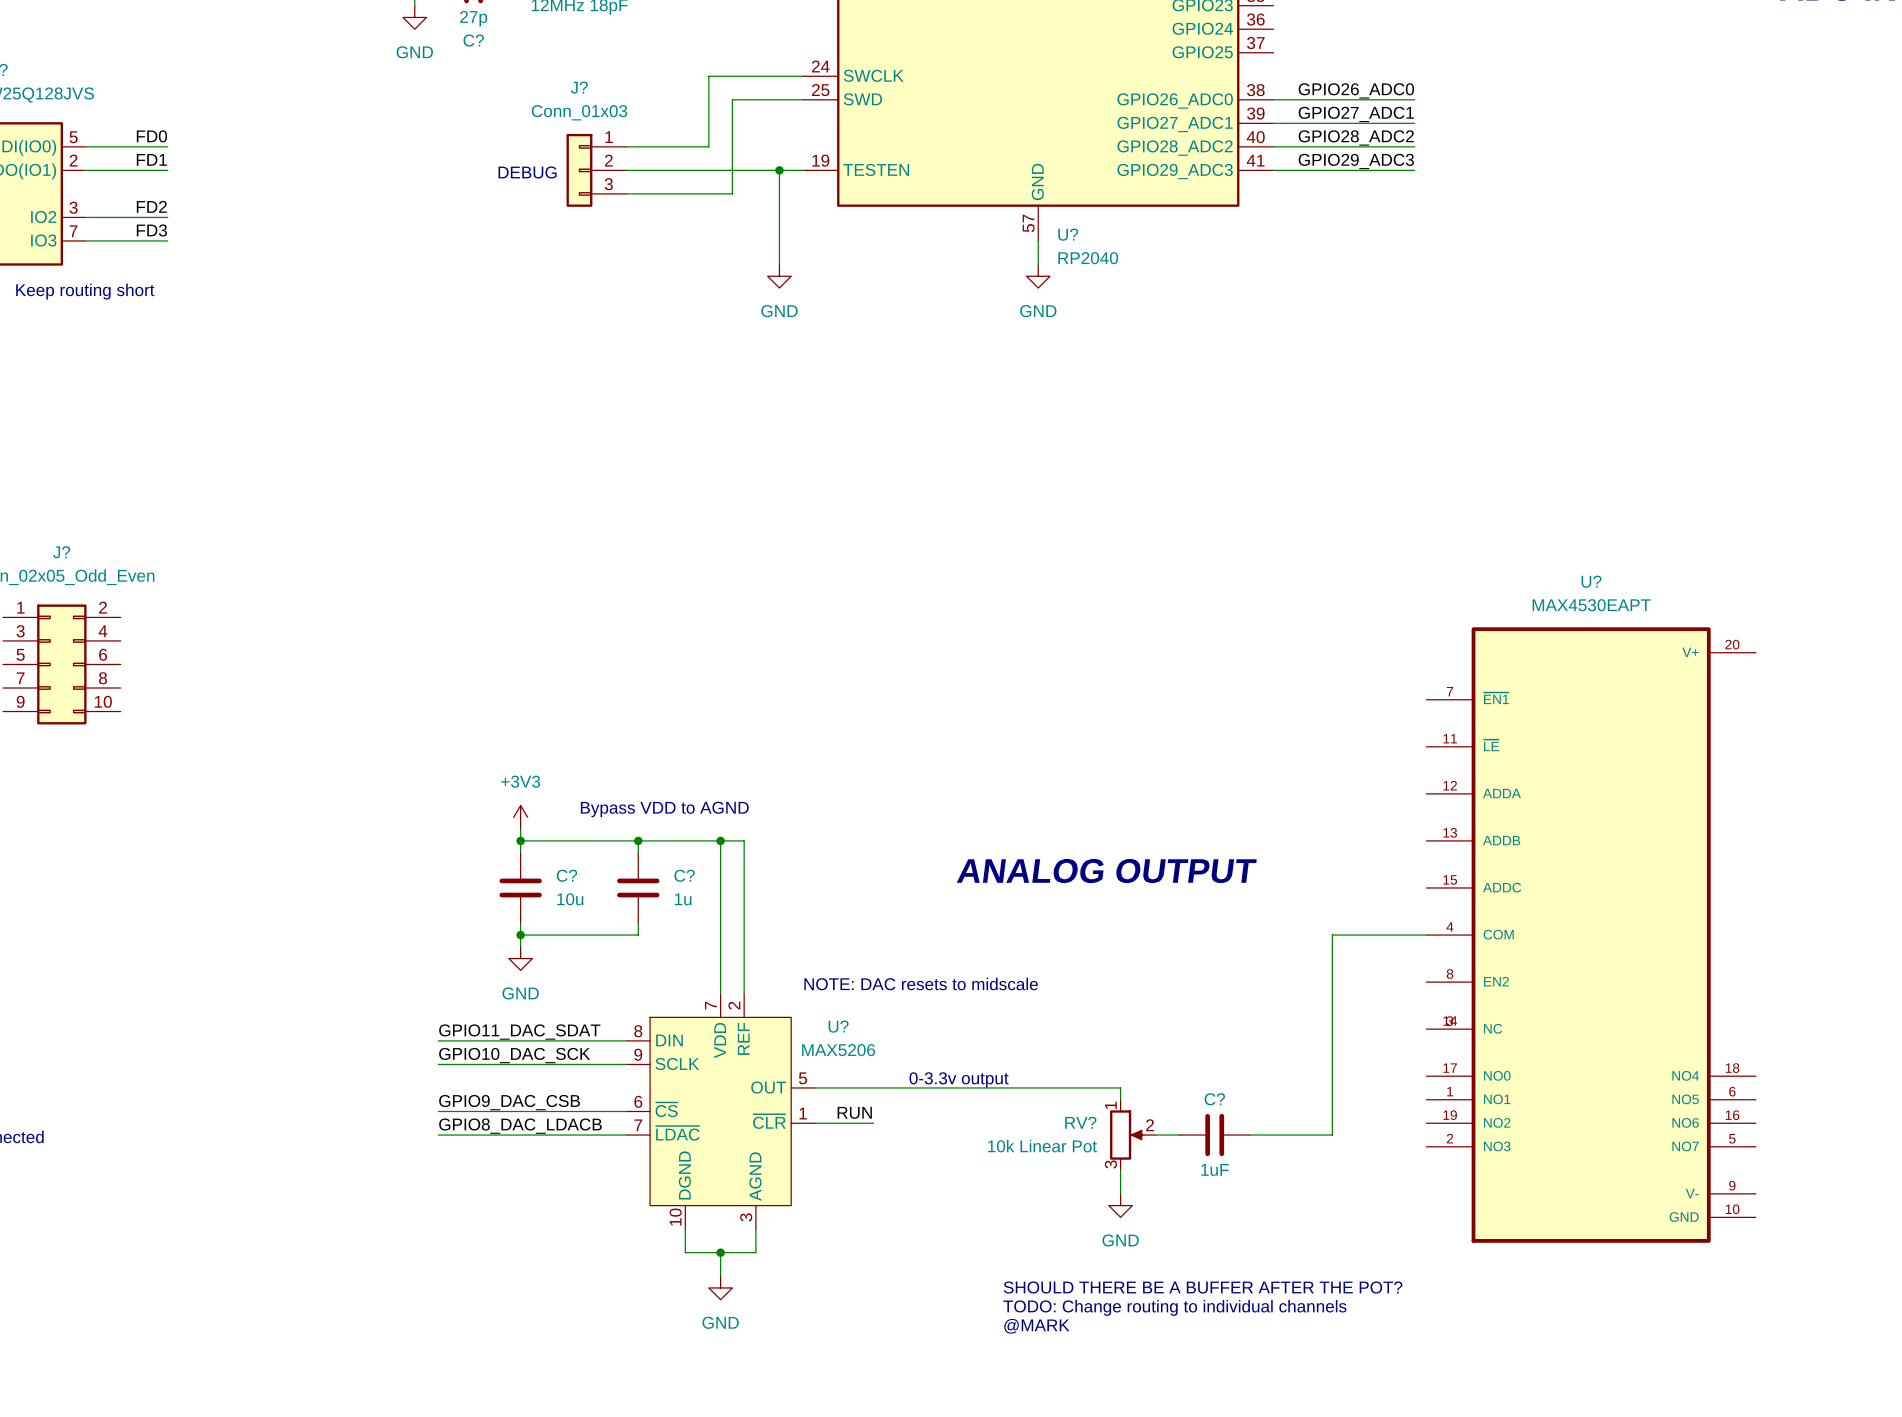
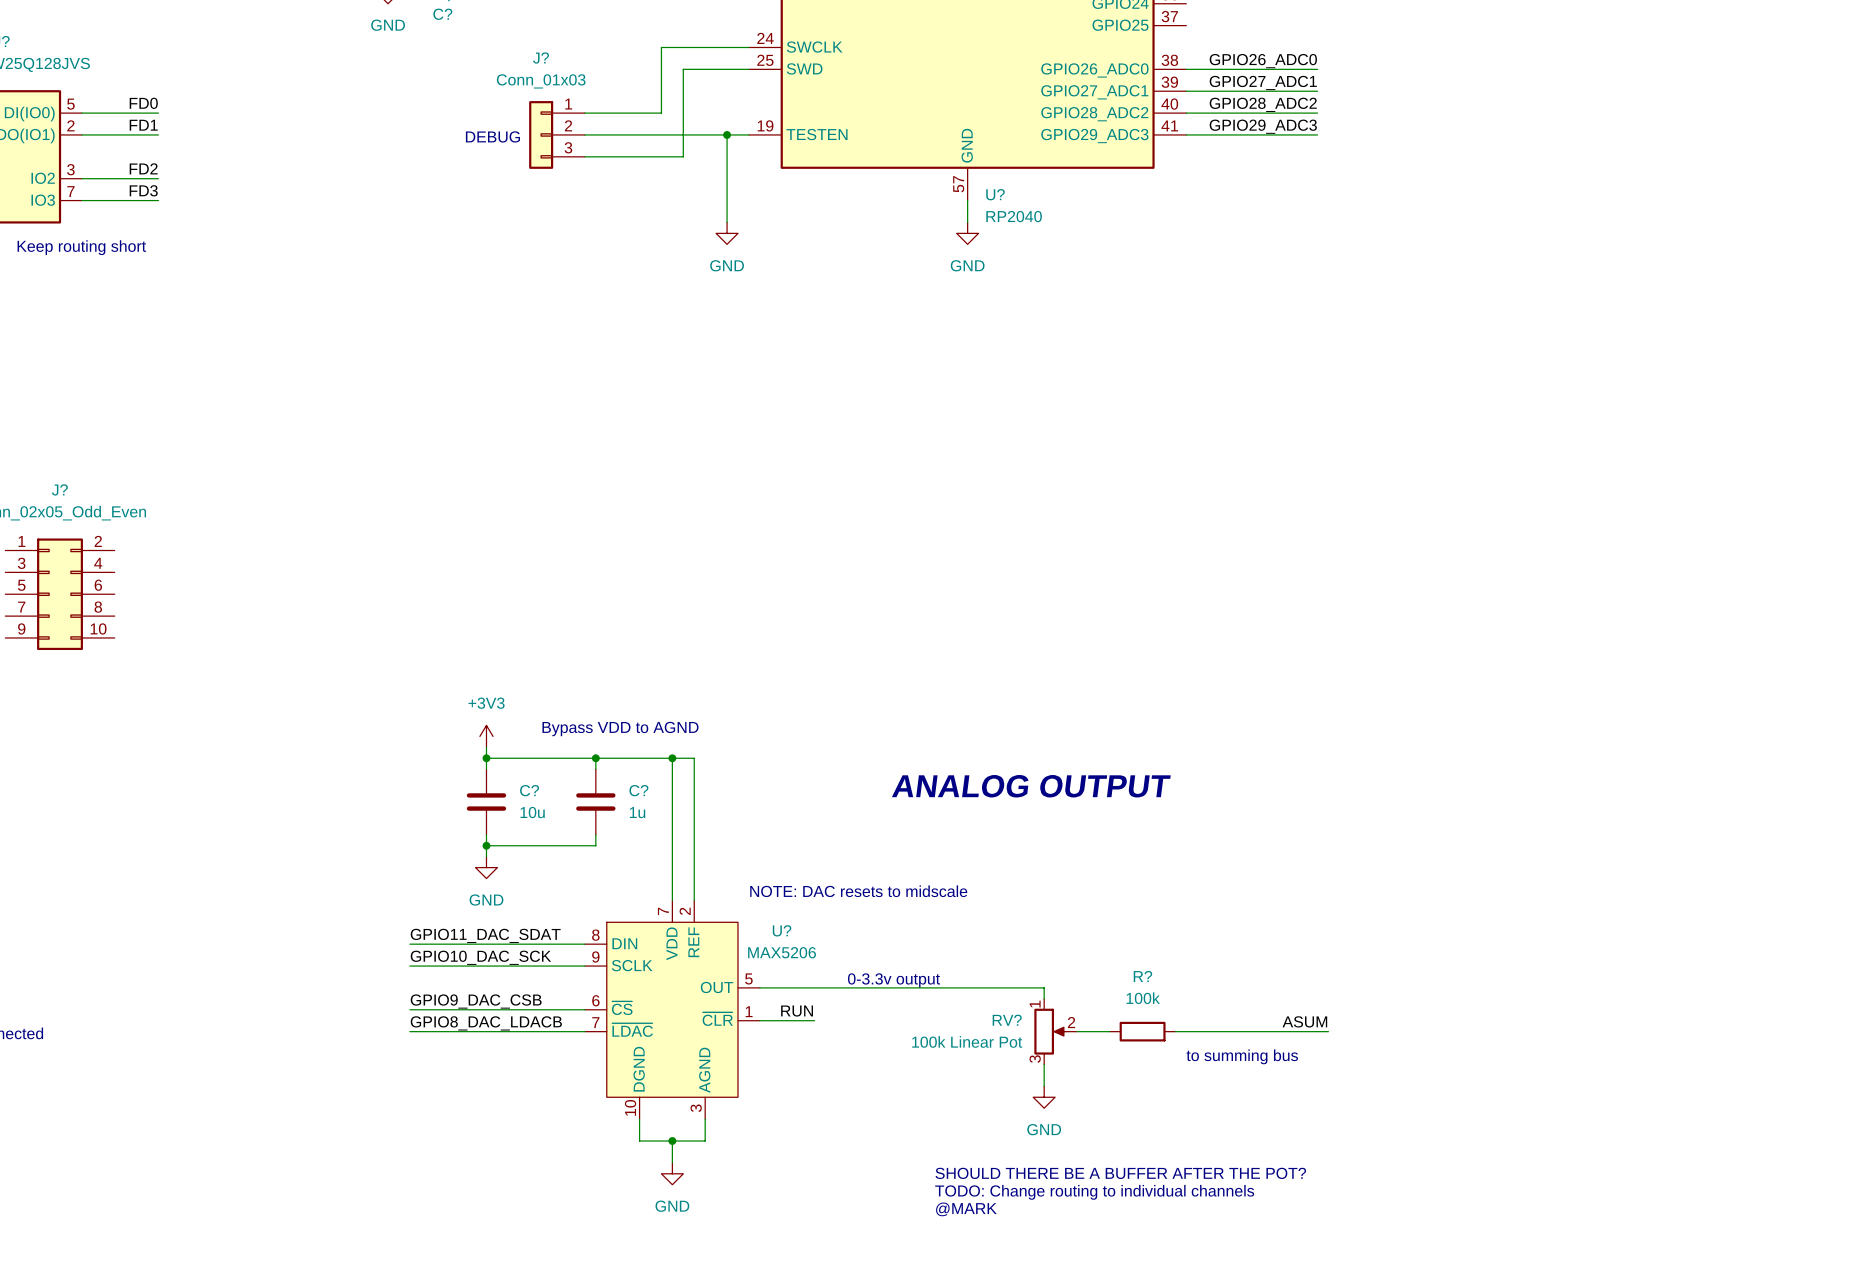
wire: (1426, 935) (1332, 935) (1332, 1135) -> (1328, 1031) (1241, 1031)
U?: MAX4530EAPT (1591, 935) -> none
label: none -> ASUM (1304, 1021)
C?: 1uF (1214, 1135) -> none
R?: none -> 100k (1142, 1031)
RV? value: 10k Linear Pot (1042, 1146) -> 100k Linear Pot (967, 1041)
text: none -> to summing bus (1242, 1056)

